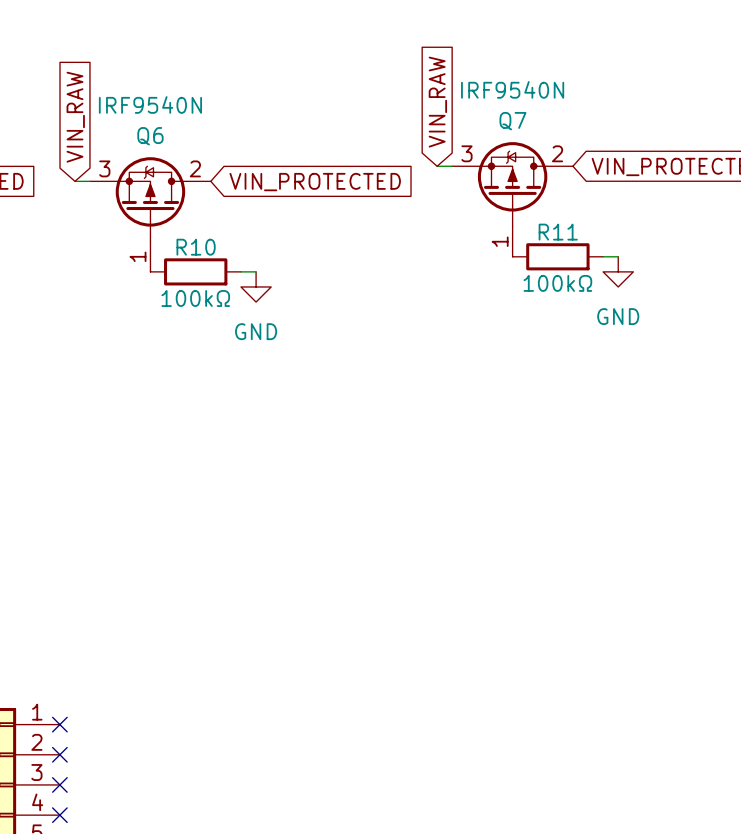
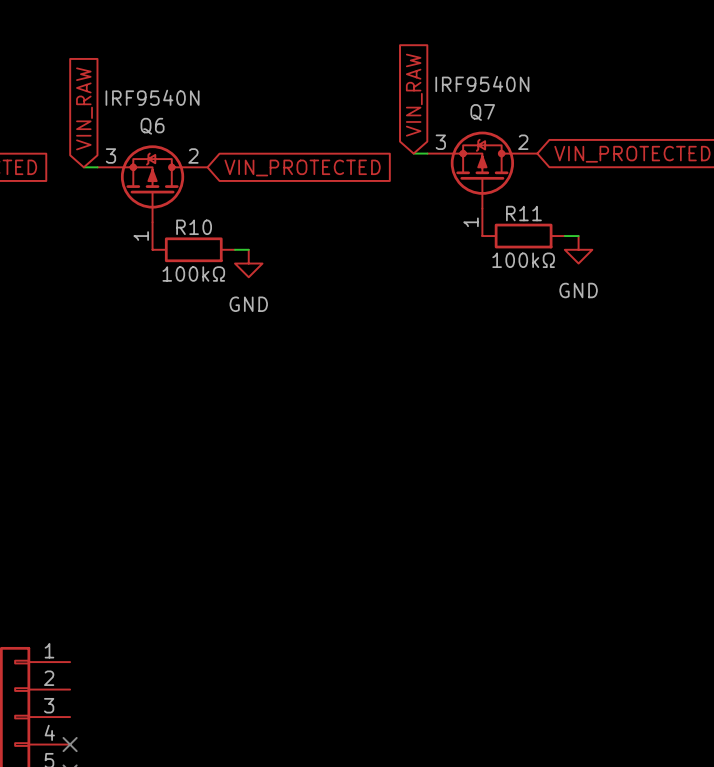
no-connect mark: (59, 724) -> none
no-connect mark: (59, 754) -> none
no-connect mark: (59, 784) -> none

